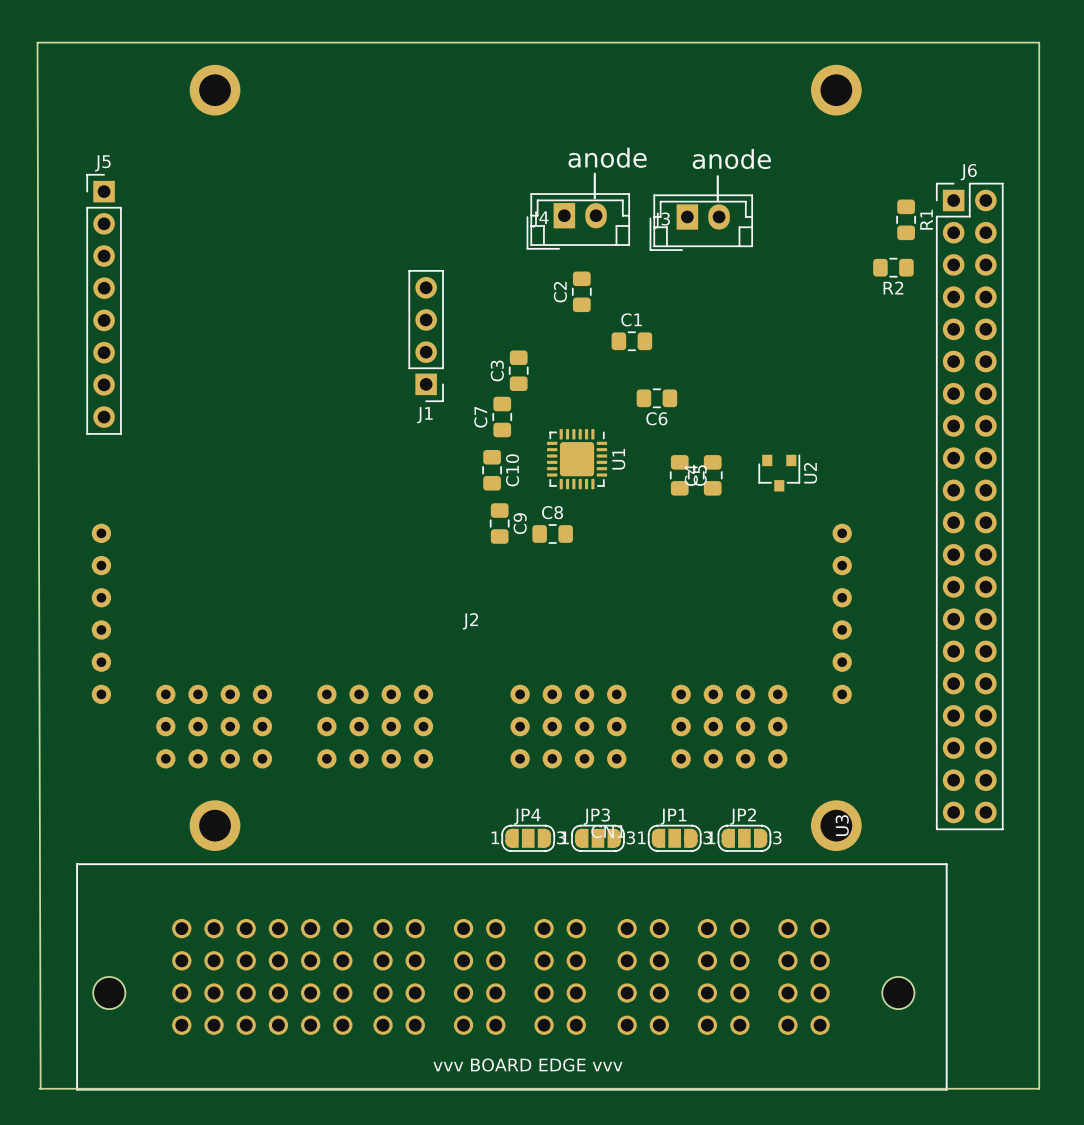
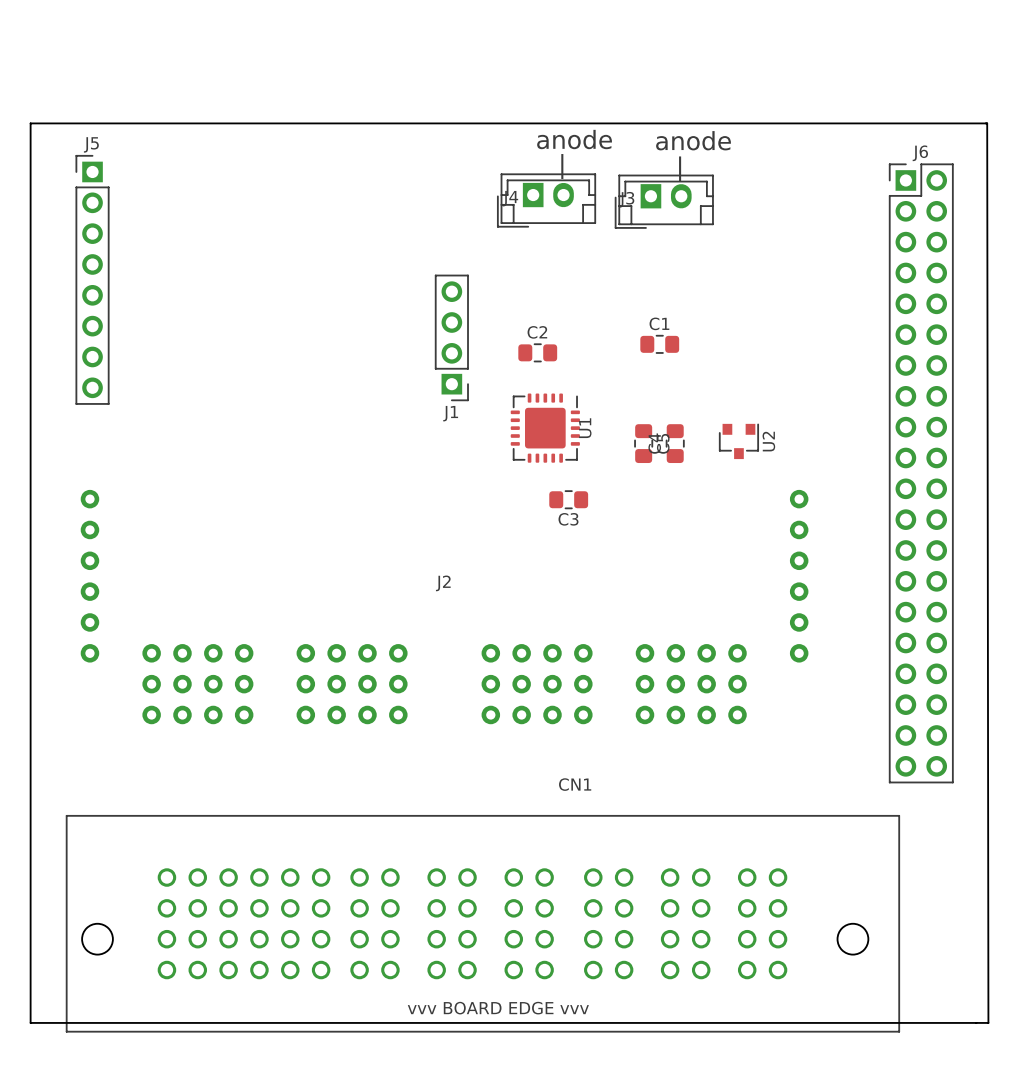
board edge: none -> (30, 123) (987, 123) (988, 1022) (30, 1022) (30, 123)
R1: (906, 219) -> none
R2: (893, 267) -> none
C2 rotation: 0° (581, 291) -> 90° clockwise (537, 352)
C2 position: (581, 291) -> (537, 352)
J1 position: (426, 336) -> (451, 337)
C1 position: (631, 341) -> (659, 344)
C3 name position: C3 (497, 370) -> C3 (568, 519)
C3 rotation: 0° (518, 370) -> 90° clockwise (568, 499)
C3 position: (518, 370) -> (568, 499)
C6: (656, 398) -> none
C7: (502, 417) -> none
U1 footprint: [546, 429, 608, 490] -> [510, 393, 580, 463]
U3: (525, 457) -> none
C10: (492, 470) -> none
C9: (499, 523) -> none
C8: (552, 533) -> none
JP4: (528, 838) -> none
JP3: (597, 838) -> none
JP1: (674, 838) -> none
JP2: (744, 838) -> none
board edge: (39, 1088) (1039, 1088) (1039, 42) (37, 42) (40, 1088) -> none

